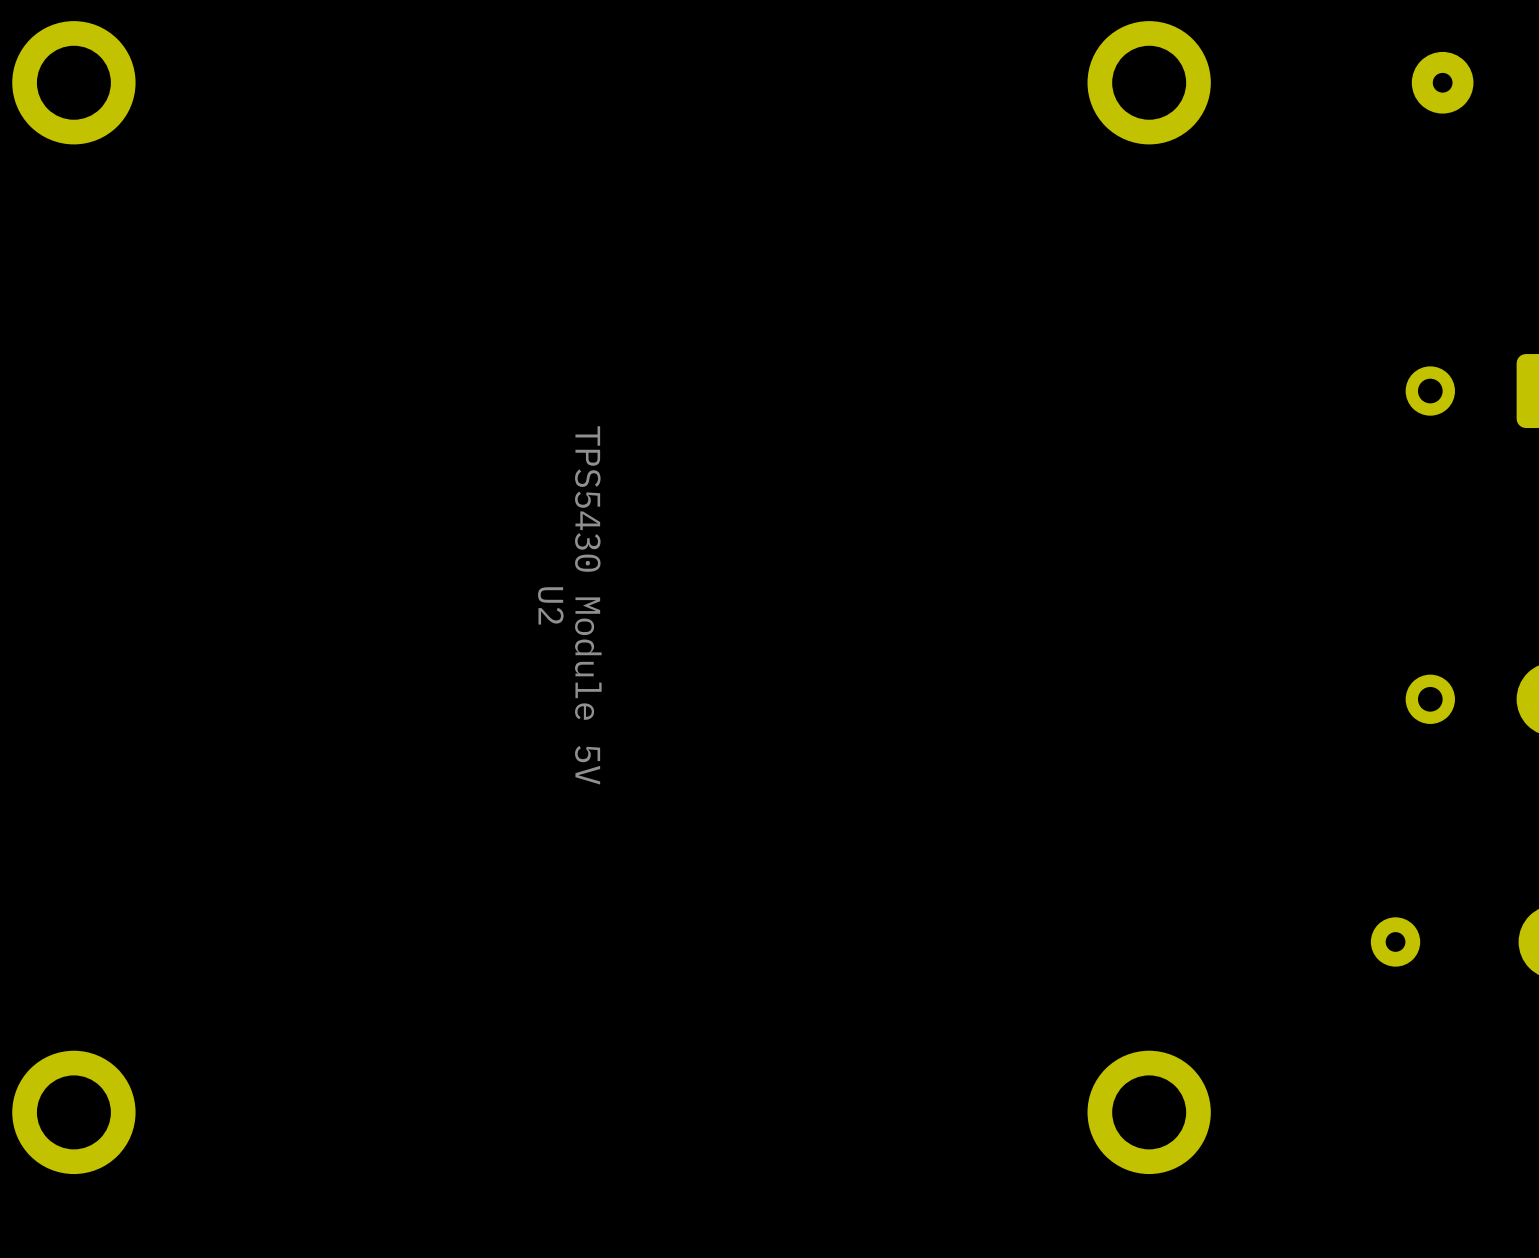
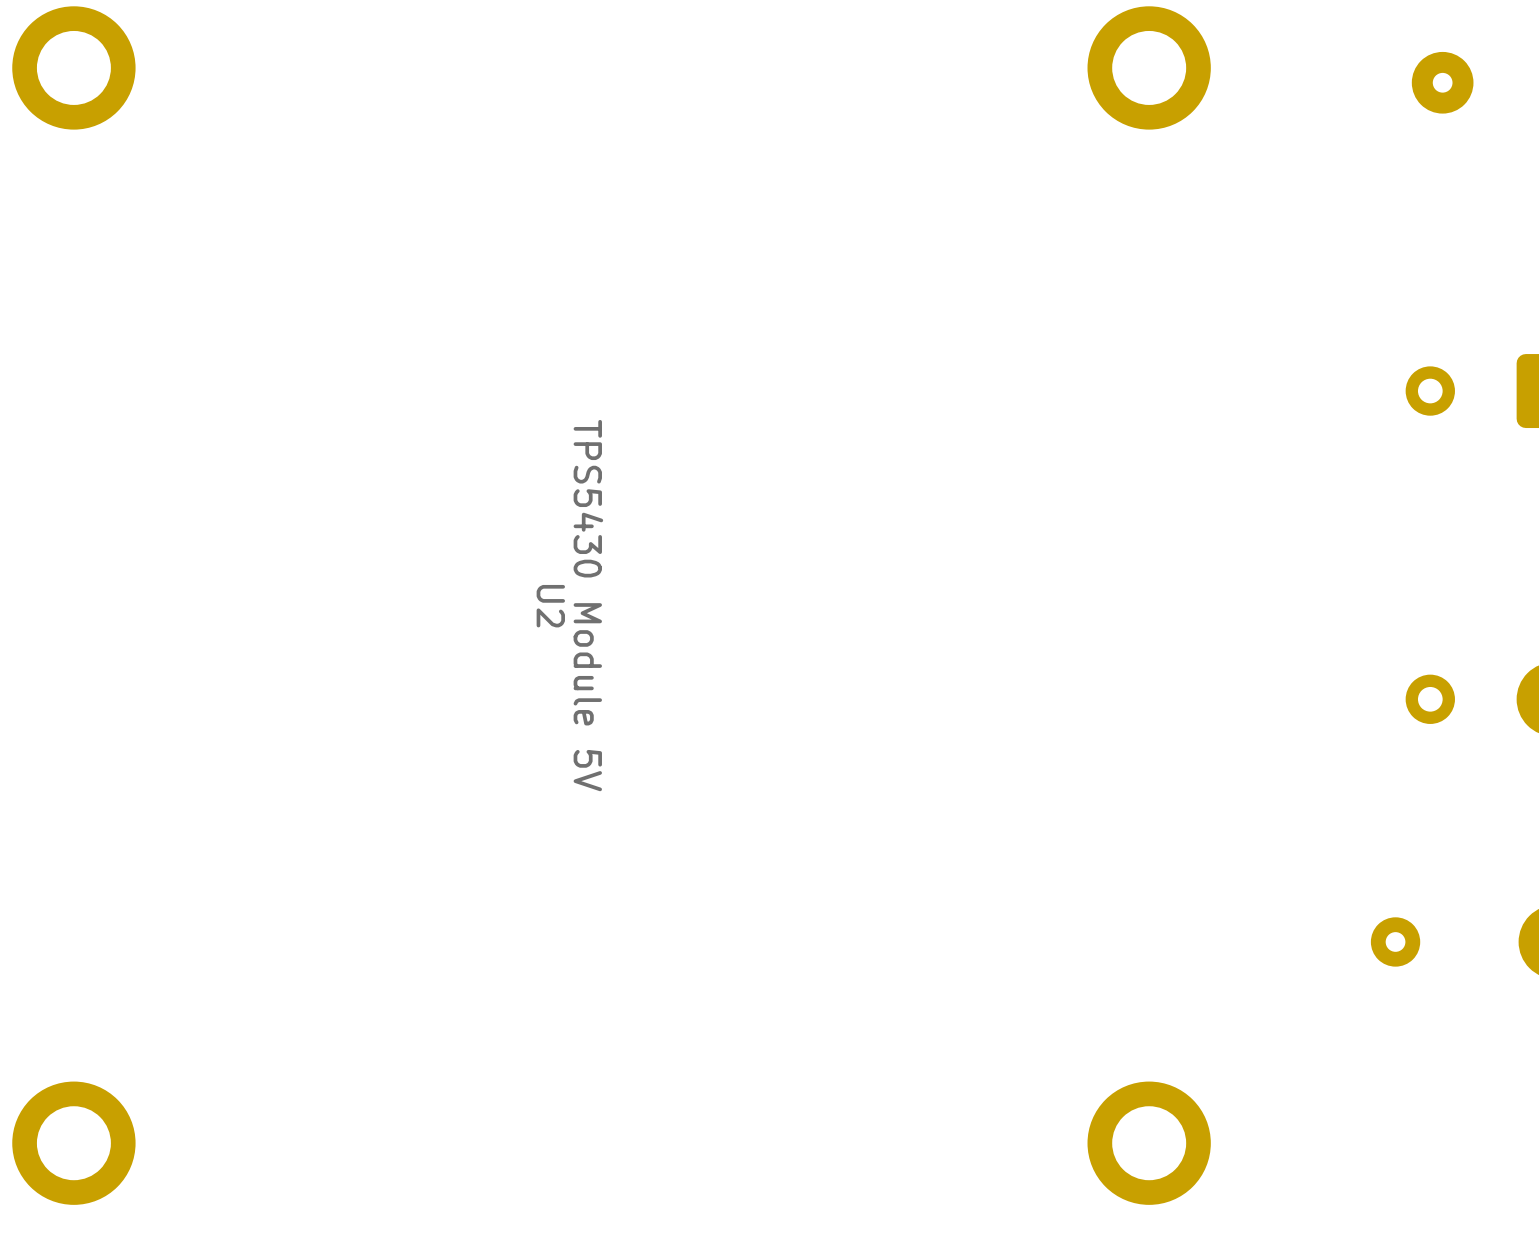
U2 footprint: [12, 21, 1211, 1175] -> [12, 6, 1211, 1205]

